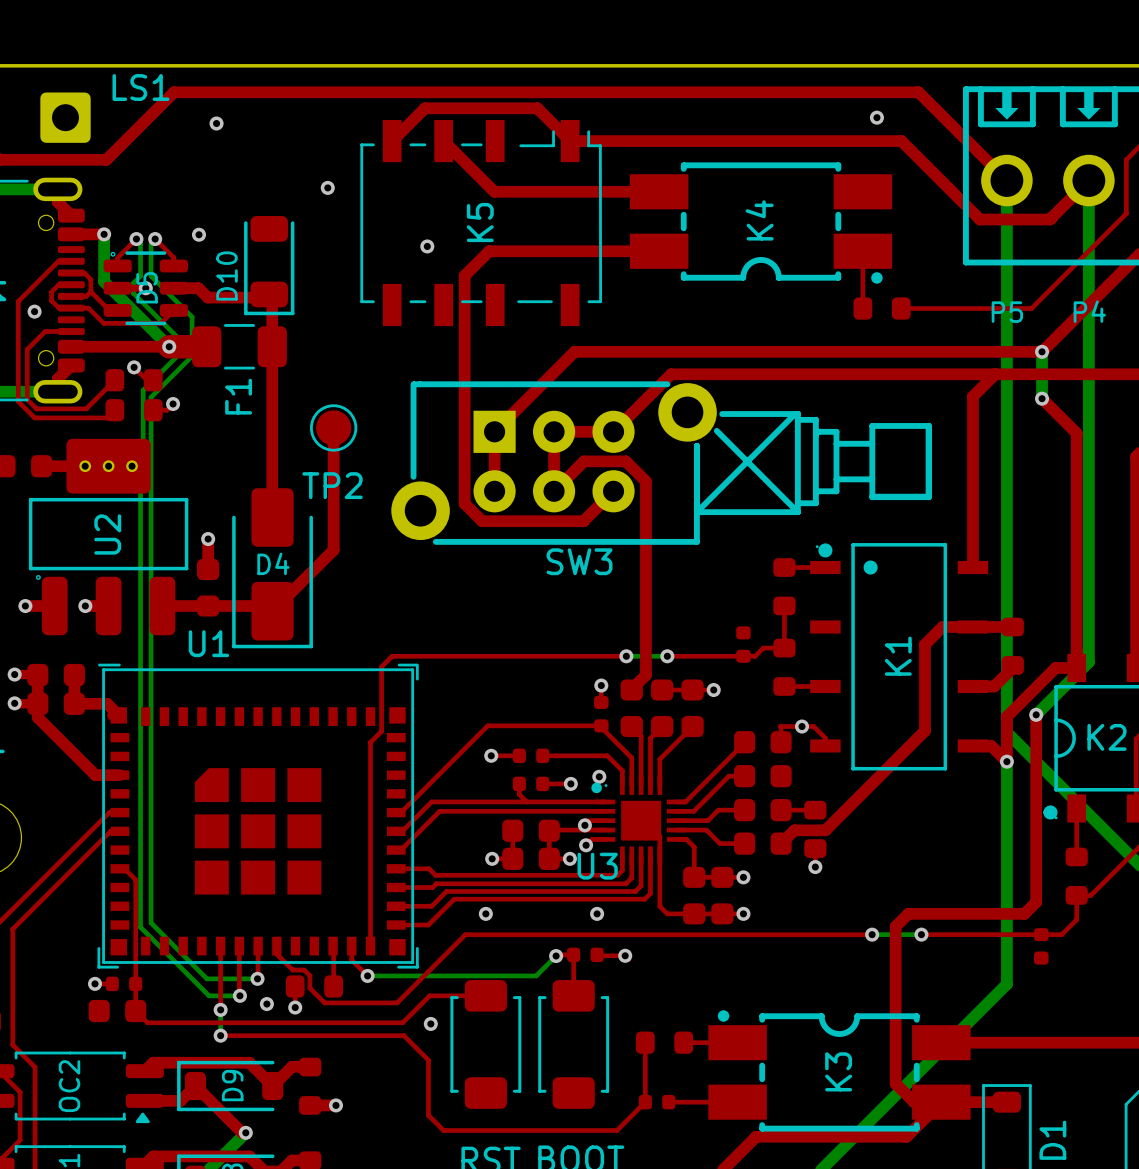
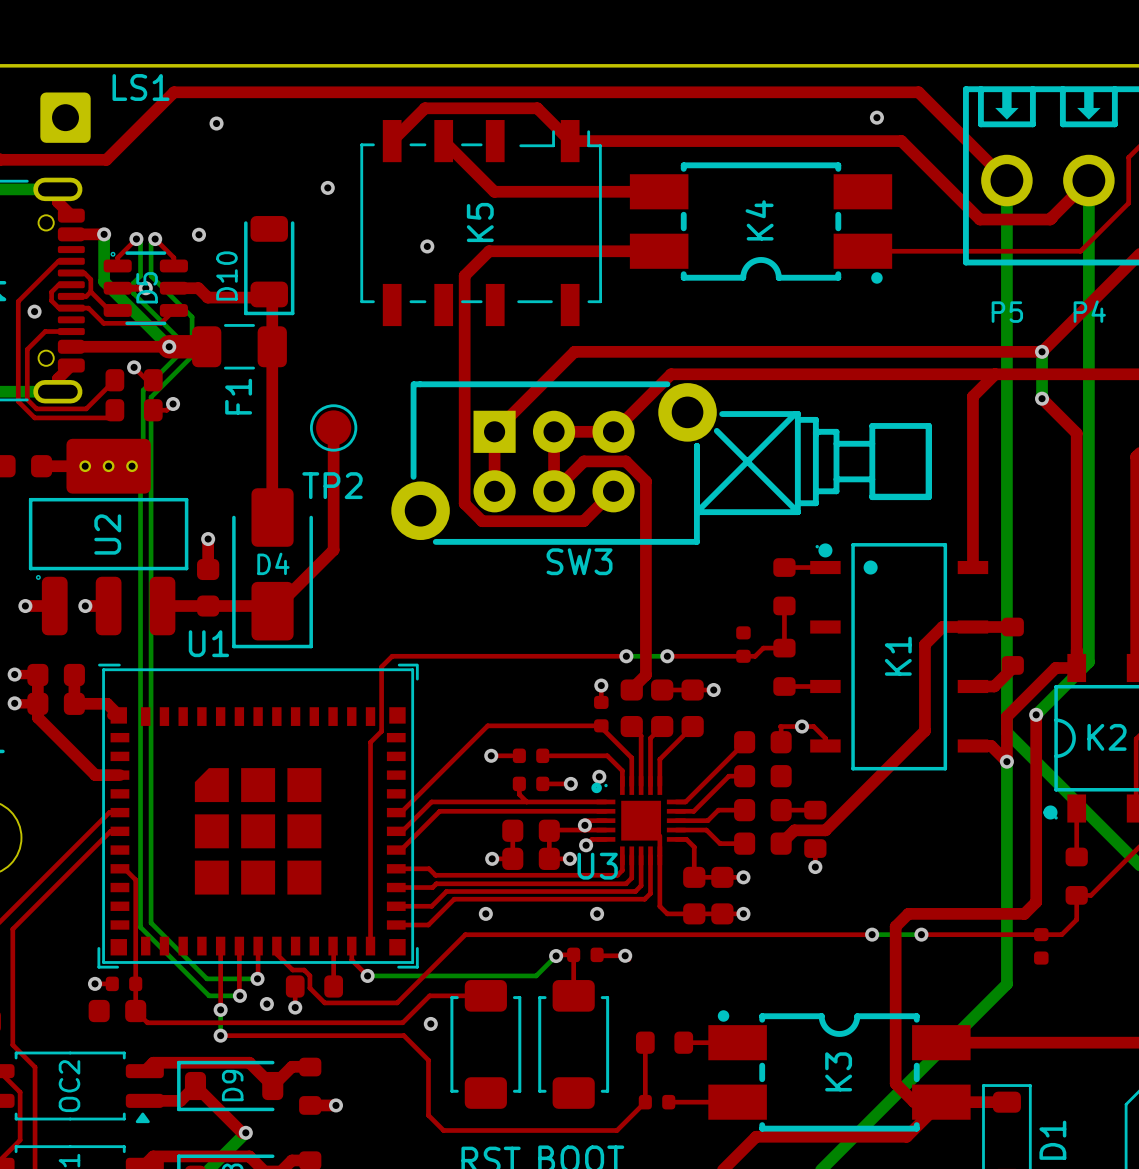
top track: (1128, 157) (1126, 159) (1126, 213) (1031, 308) (901, 308) -> (1128, 157) (1128, 203) (1080, 251) (862, 251)
top track: (862, 251) (862, 308) -> none
part: (882, 308) -> none

